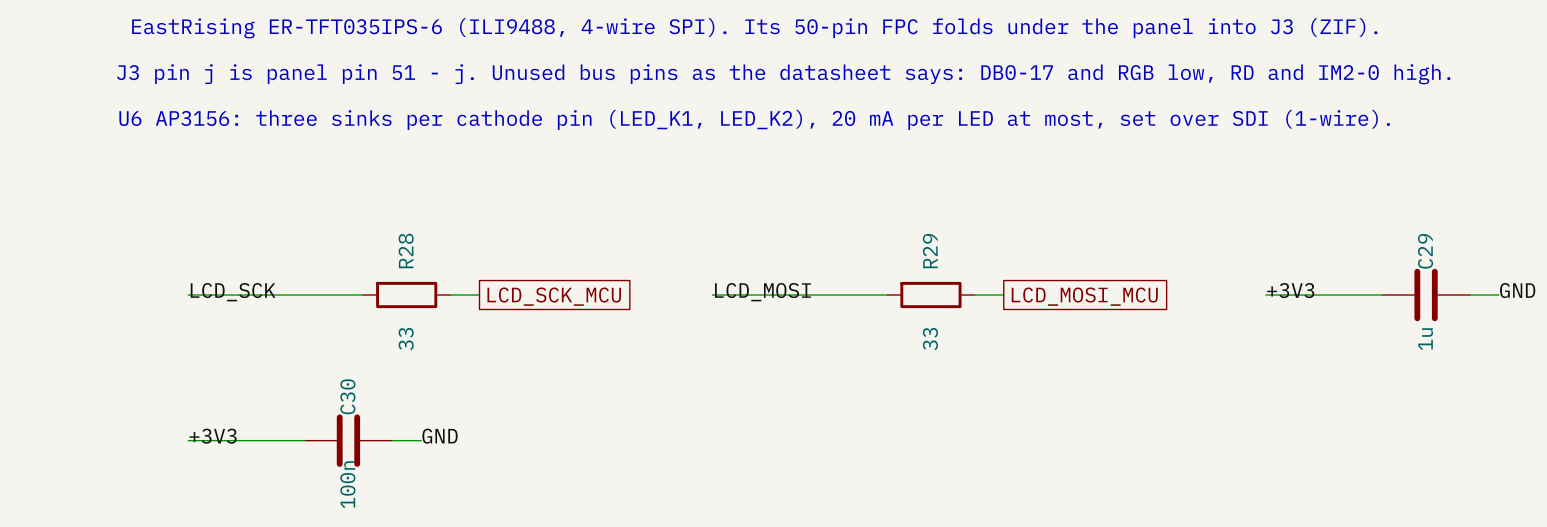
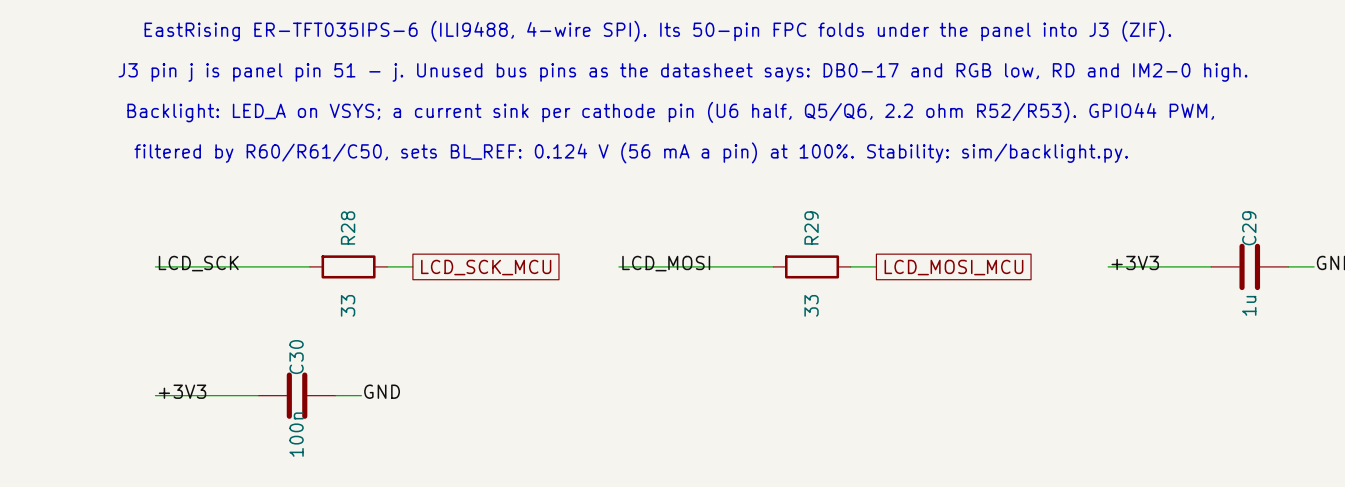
text: U6 AP3156: three sinks per cathode pin (LED_K1, LED_K2), 20 mA per LED at most, set over SDI (1-wire). (754, 119) -> none
text: none -> Backlight: LED_A on VSYS; a current sink per cathode pin (U6 half, Q5/Q6, 2.2 ohm R52/R53). GPIO44 PWM, (670, 112)
text: none -> filtered by R60/R61/C50, sets BL_REF: 0.124 V (56 mA a pin) at 100%. Stability: sim/backlight.py. (631, 152)

